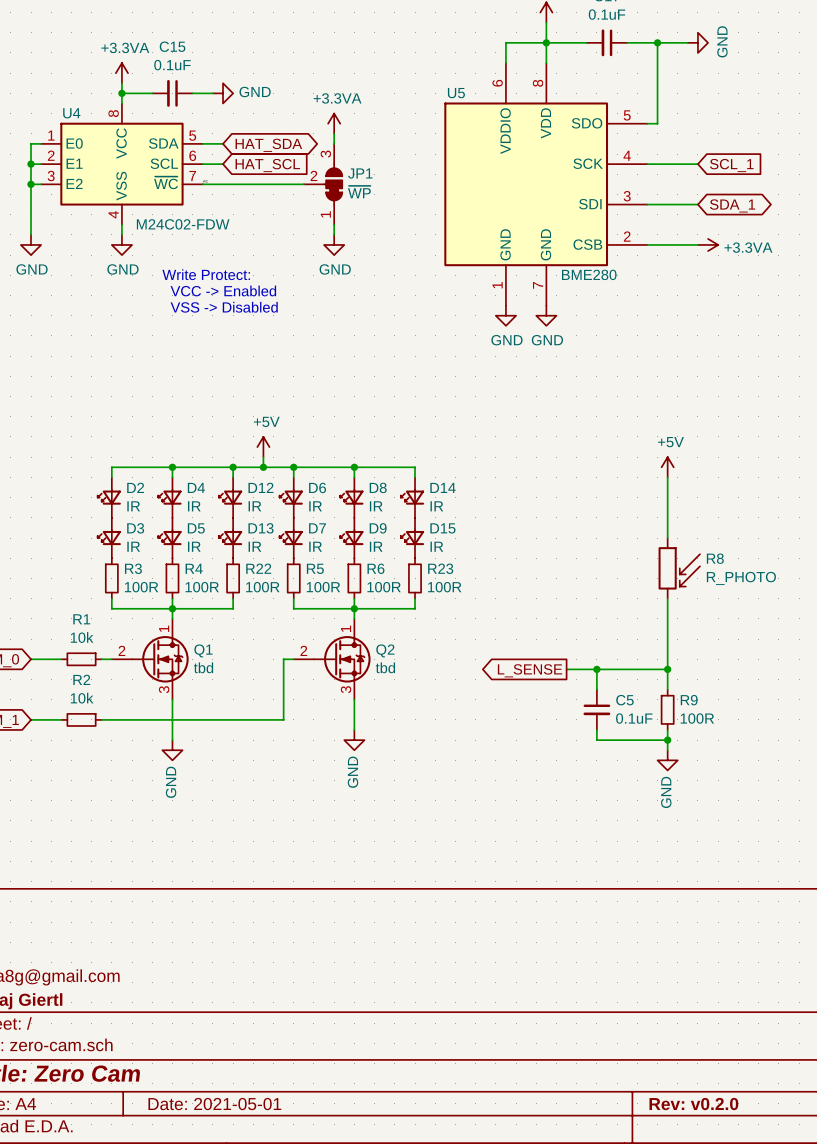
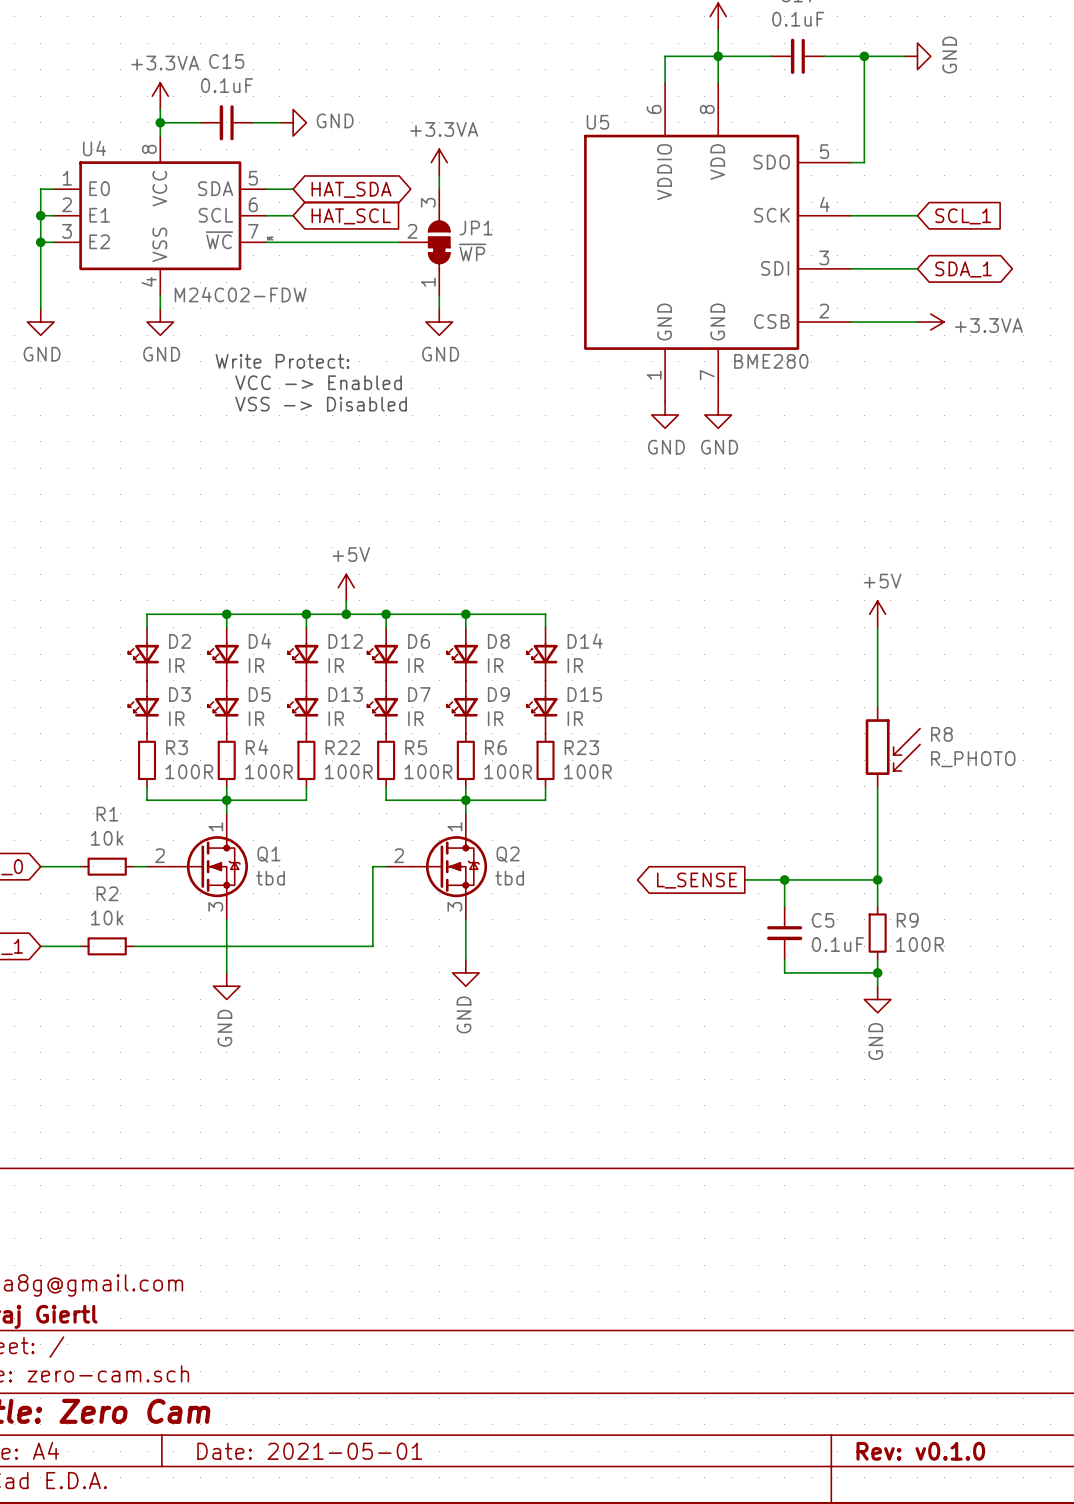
title block: Rev: v0.2.0 (693, 1104) -> Rev: v0.1.0 (920, 1451)

